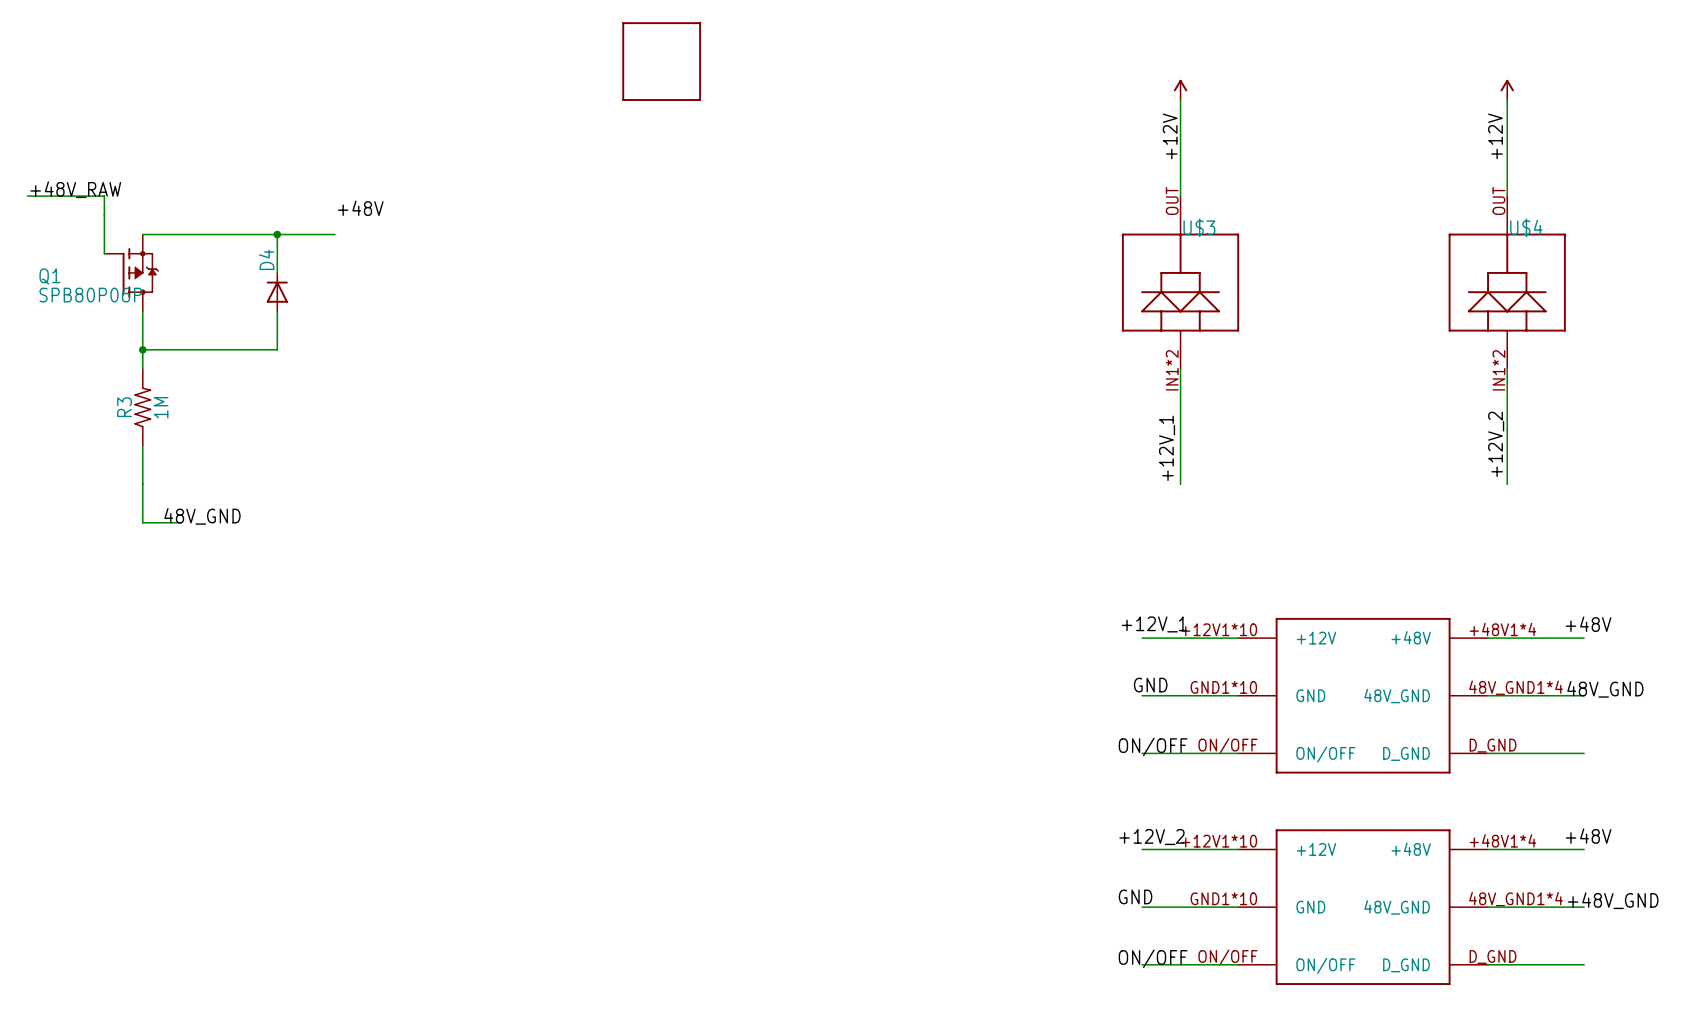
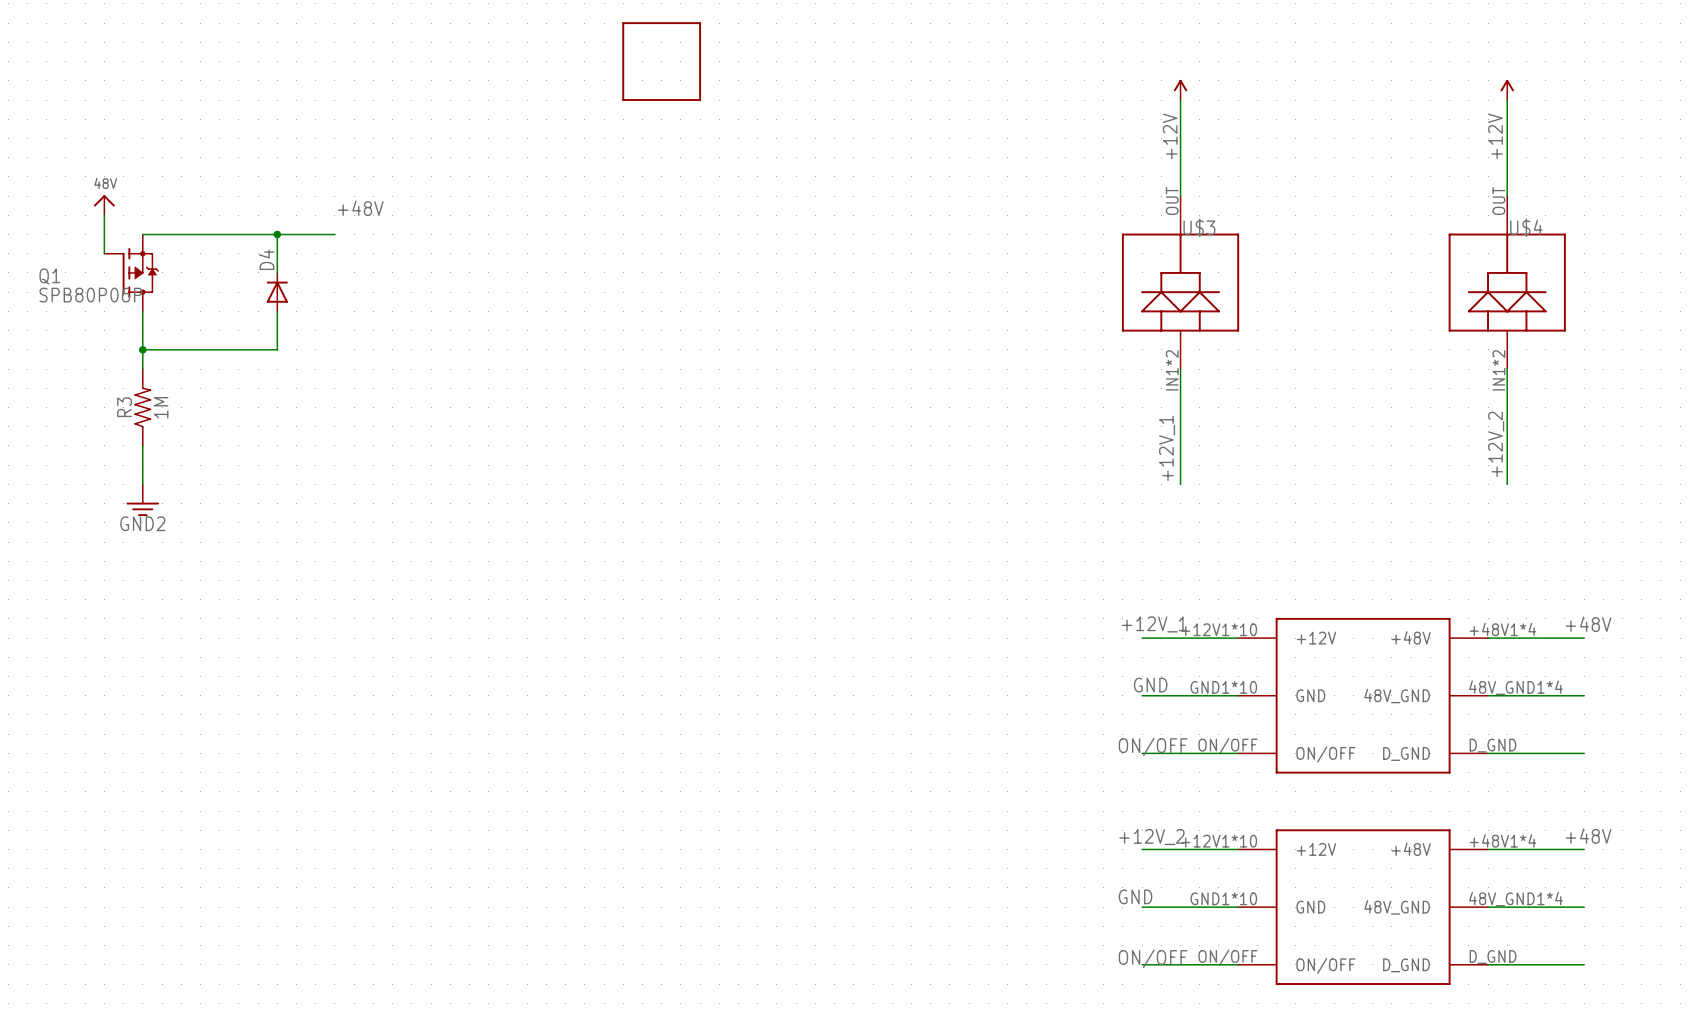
label: +48V_RAW (75, 189) -> none
wire: (27, 196) (104, 196) (104, 215) -> none
power symbol: none -> 48V (104, 205)
wire: (142, 484) (142, 522) (181, 522) -> none
power symbol: none -> GND2 (142, 500)
label: 48V_GND (202, 516) -> none
label: 48V_GND (1605, 689) -> none
label: +48V_GND (1613, 900) -> none

